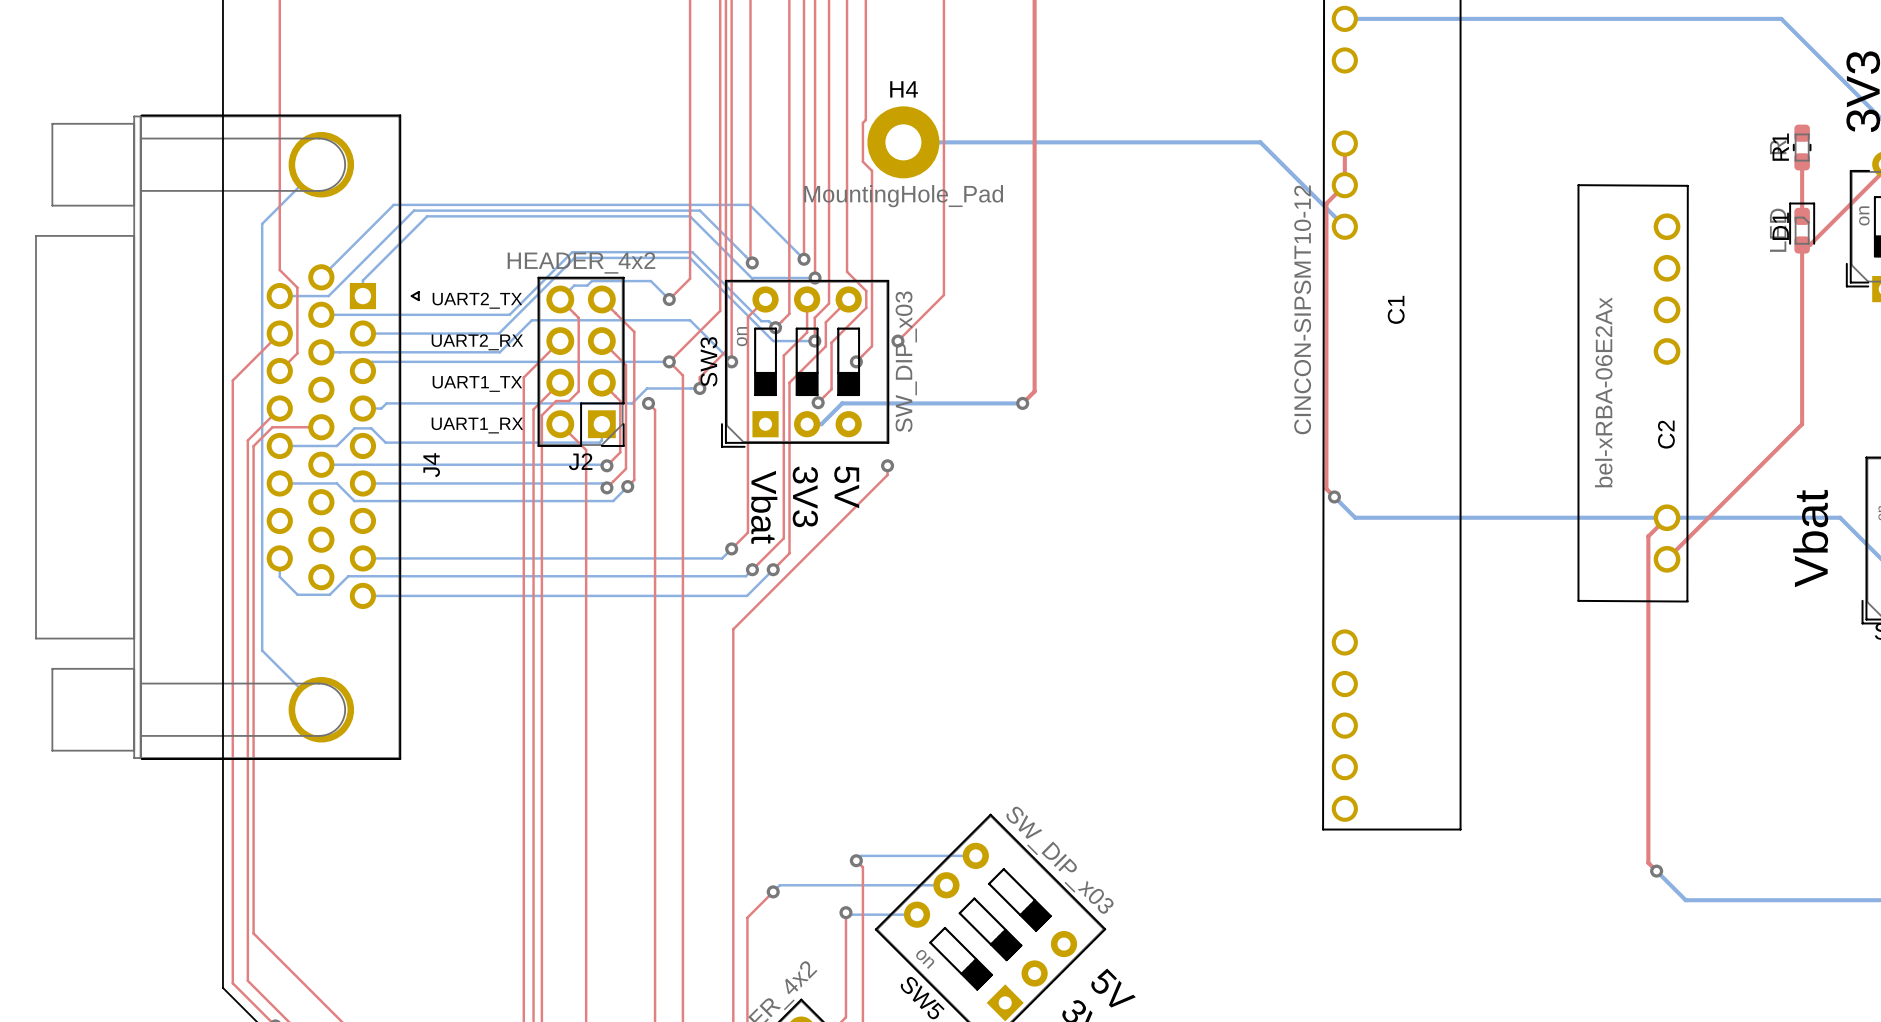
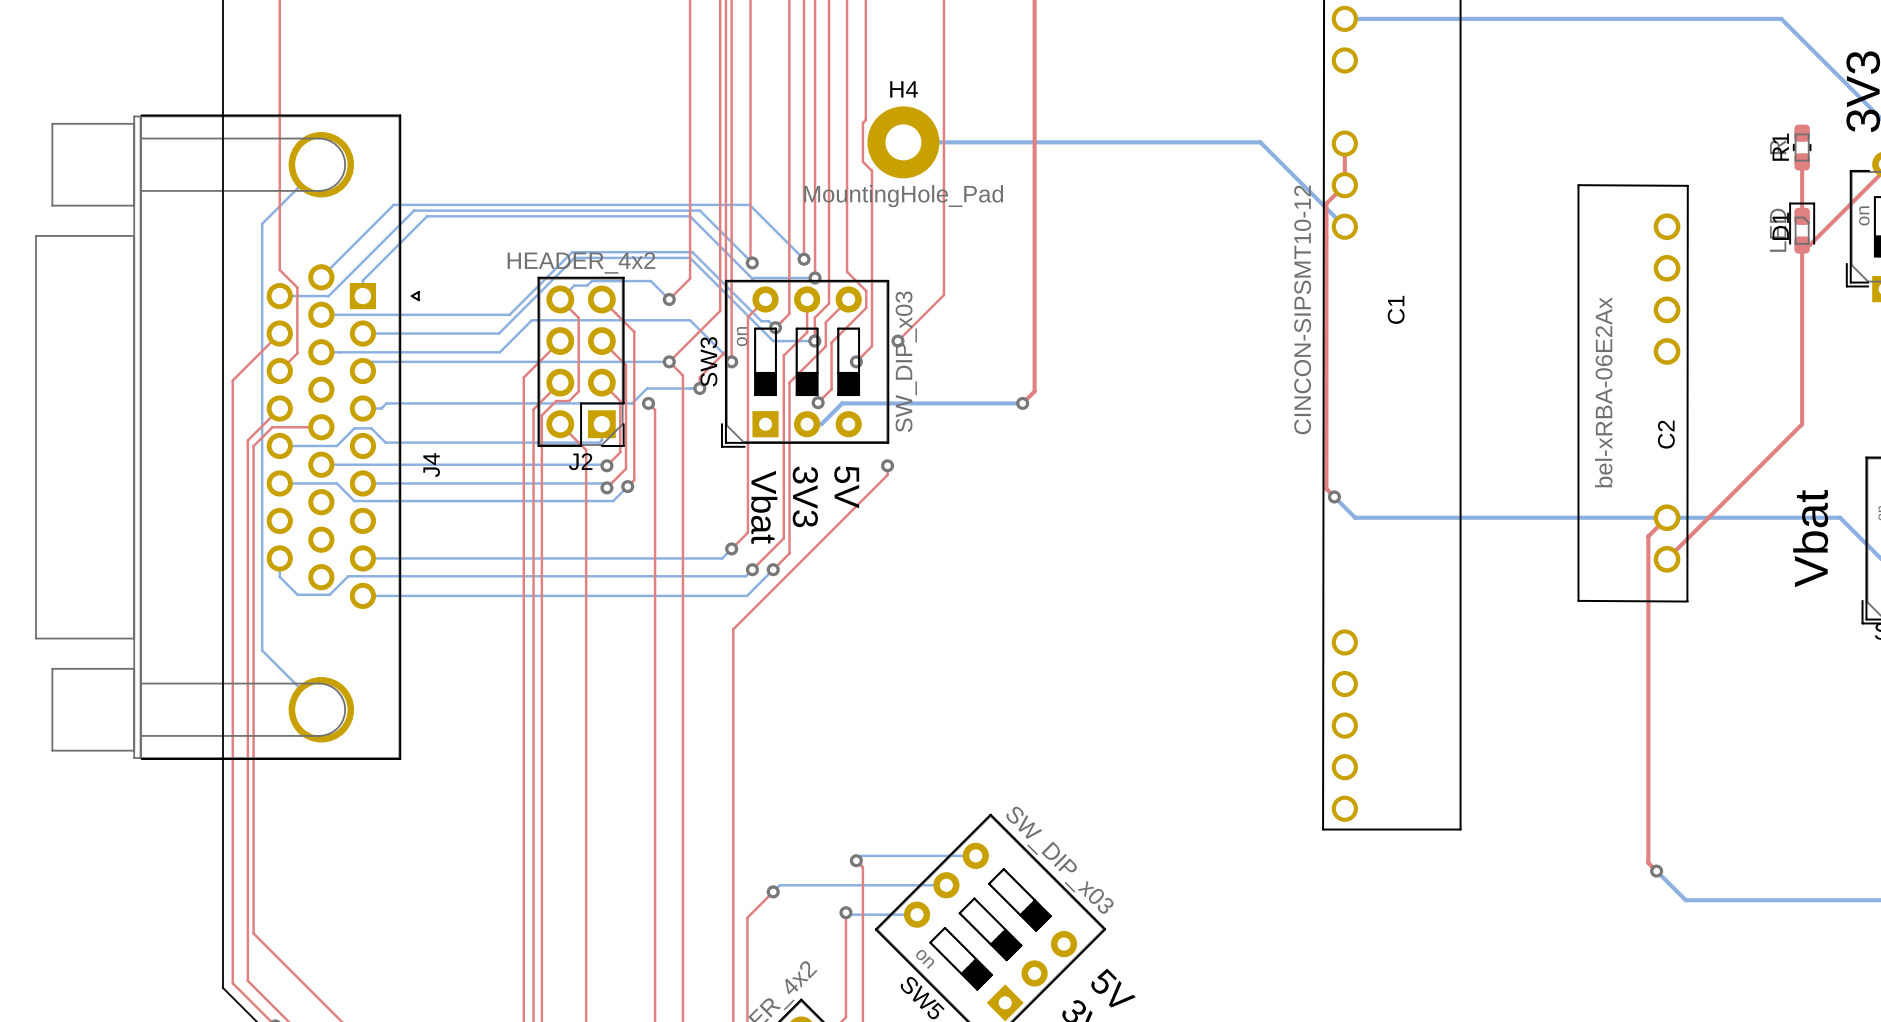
text: UART2_TX (477, 300) -> none
text: UART2_RX (477, 342) -> none
text: UART1_TX (477, 383) -> none
text: UART1_RX (477, 425) -> none

